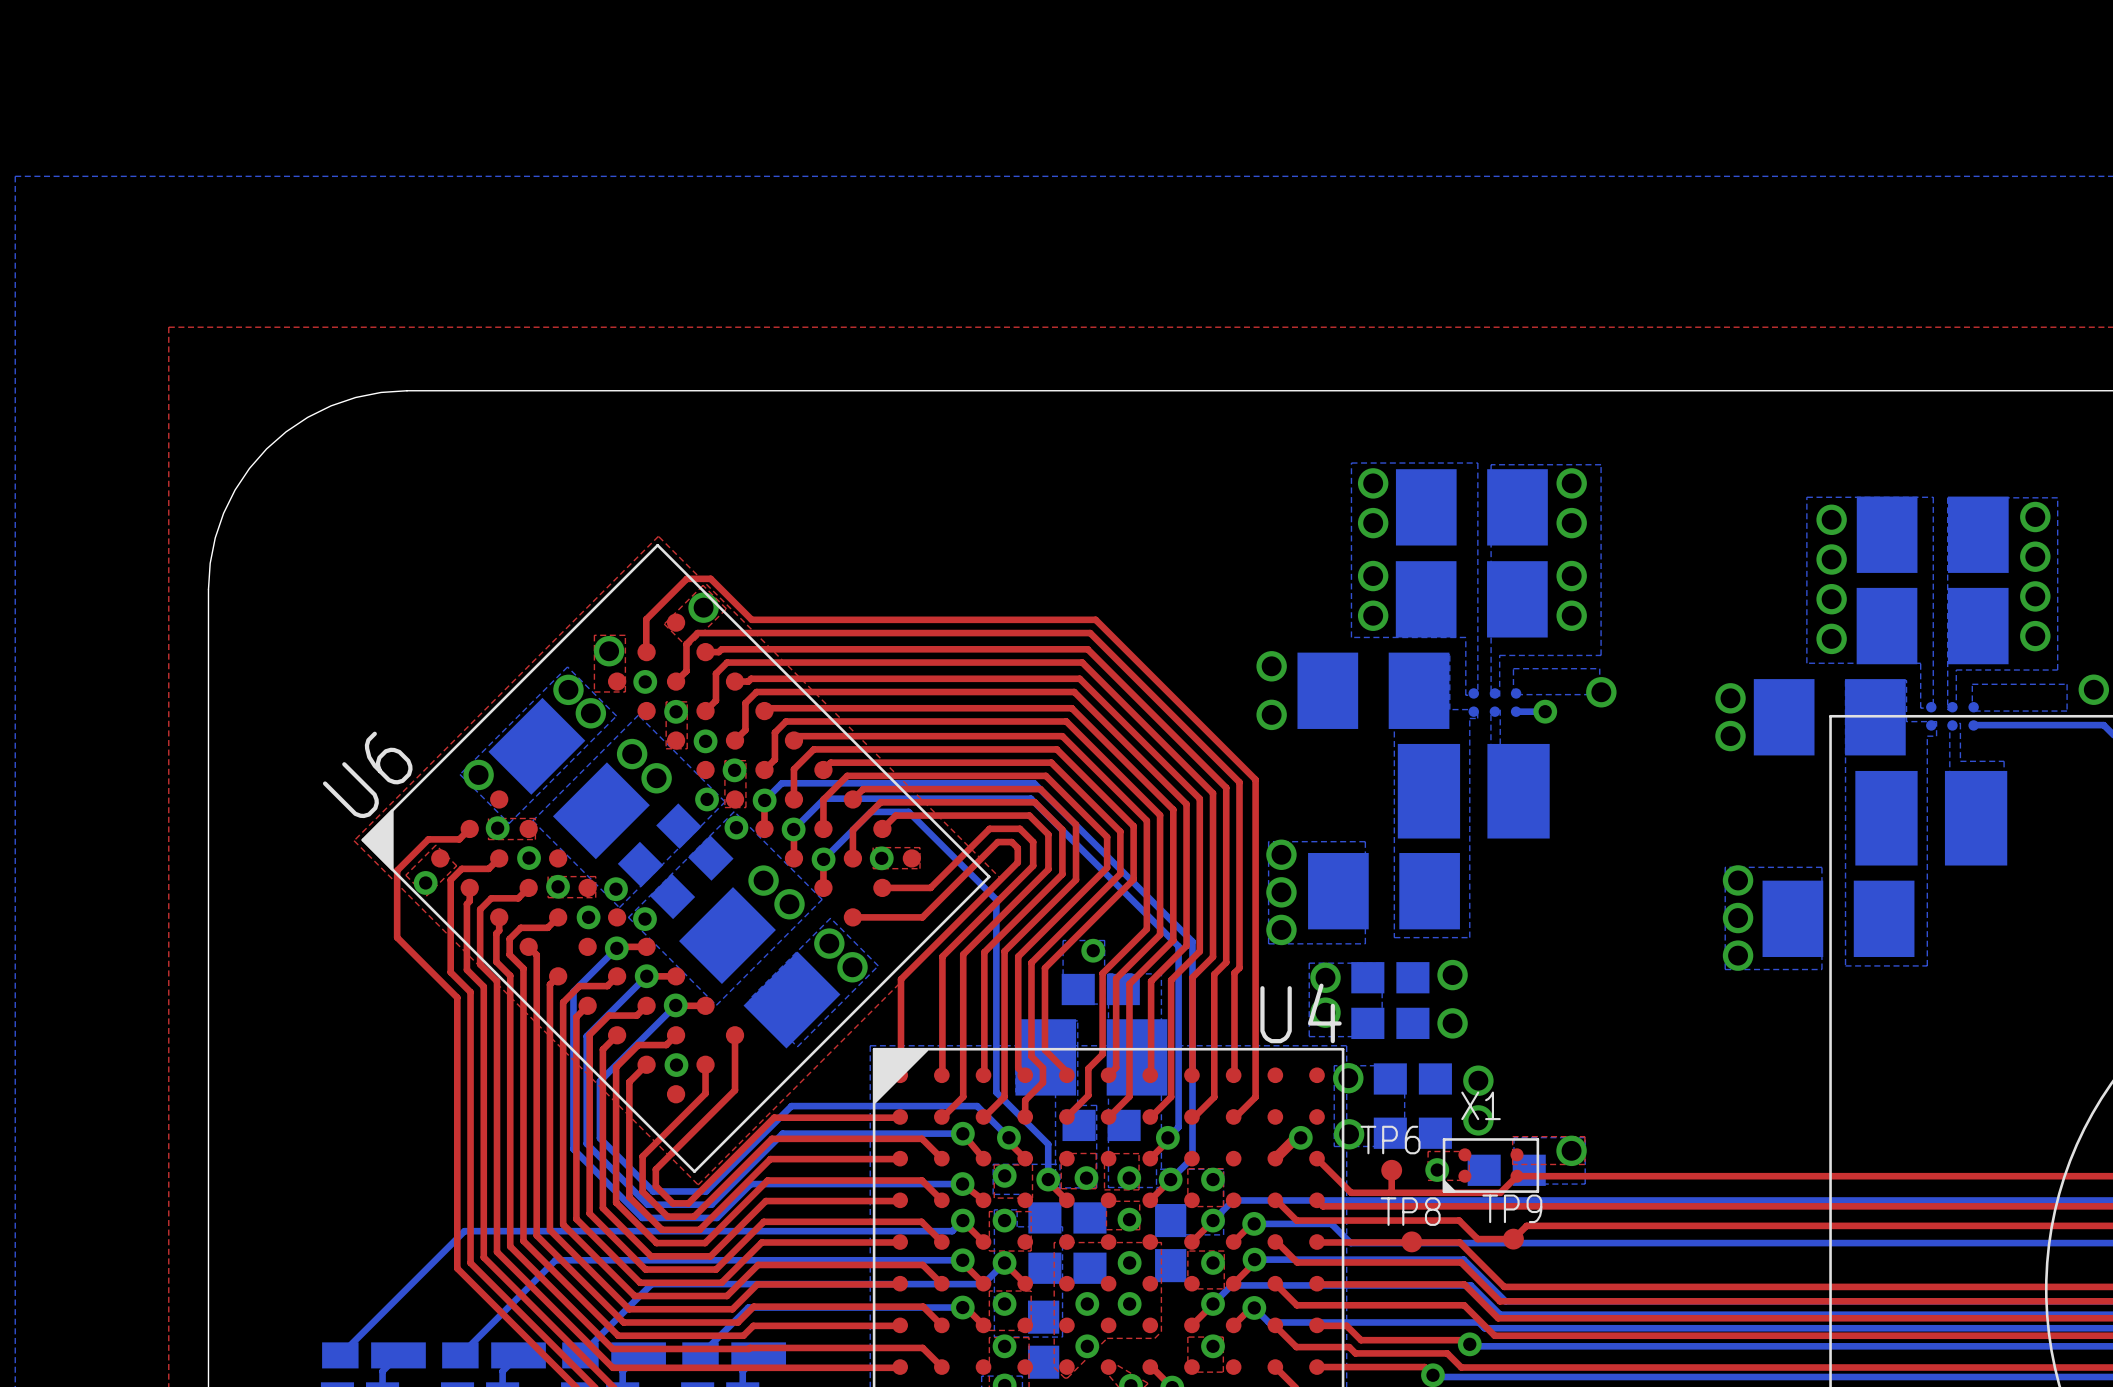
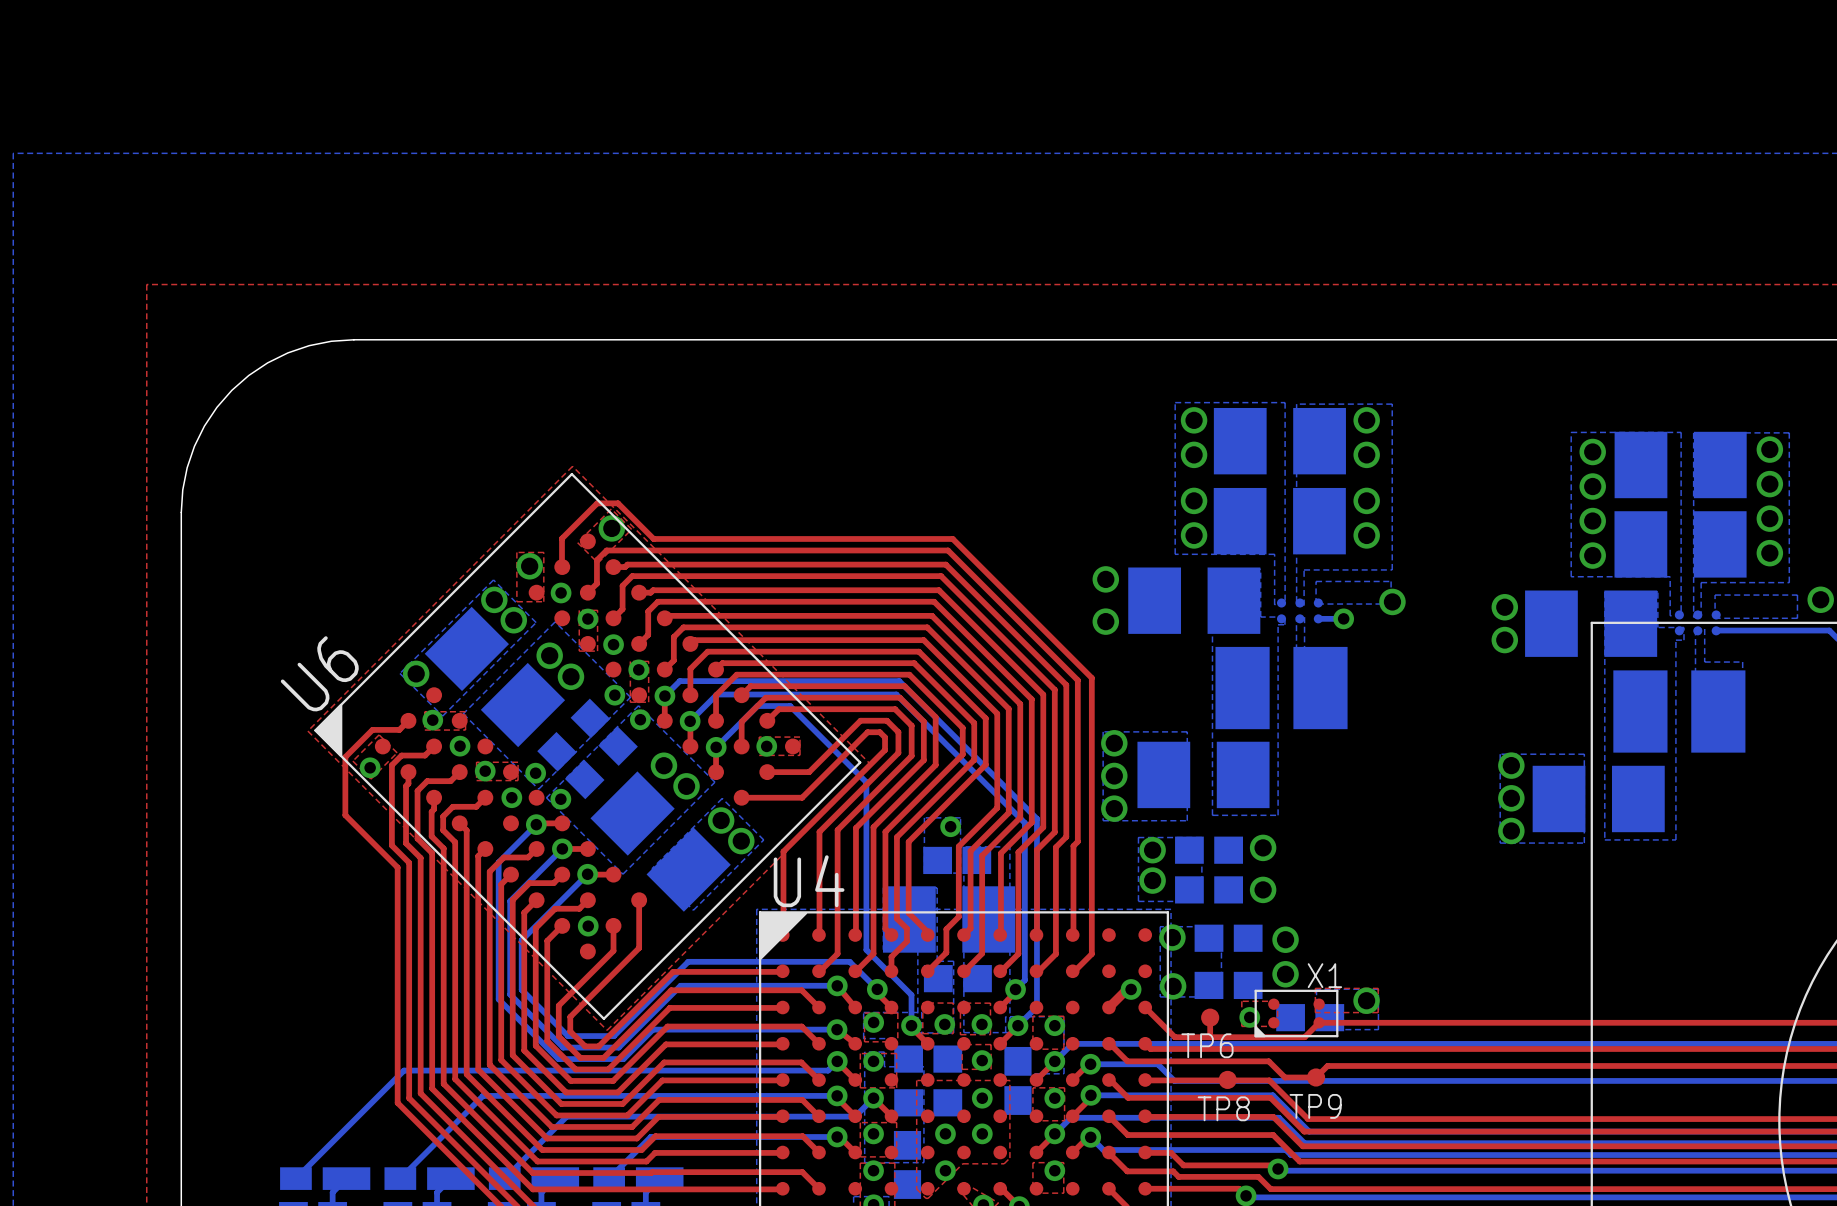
U4 name position: U4 (1301, 1013) -> U4 (809, 881)
X1 name position: X1 (1481, 1105) -> X1 (1324, 975)
TP6 name position: TP6 (1390, 1140) -> TP6 (1207, 1045)
TP9 name position: TP9 (1512, 1208) -> TP9 (1315, 1106)
TP8 name position: TP8 (1410, 1211) -> TP8 (1223, 1108)

